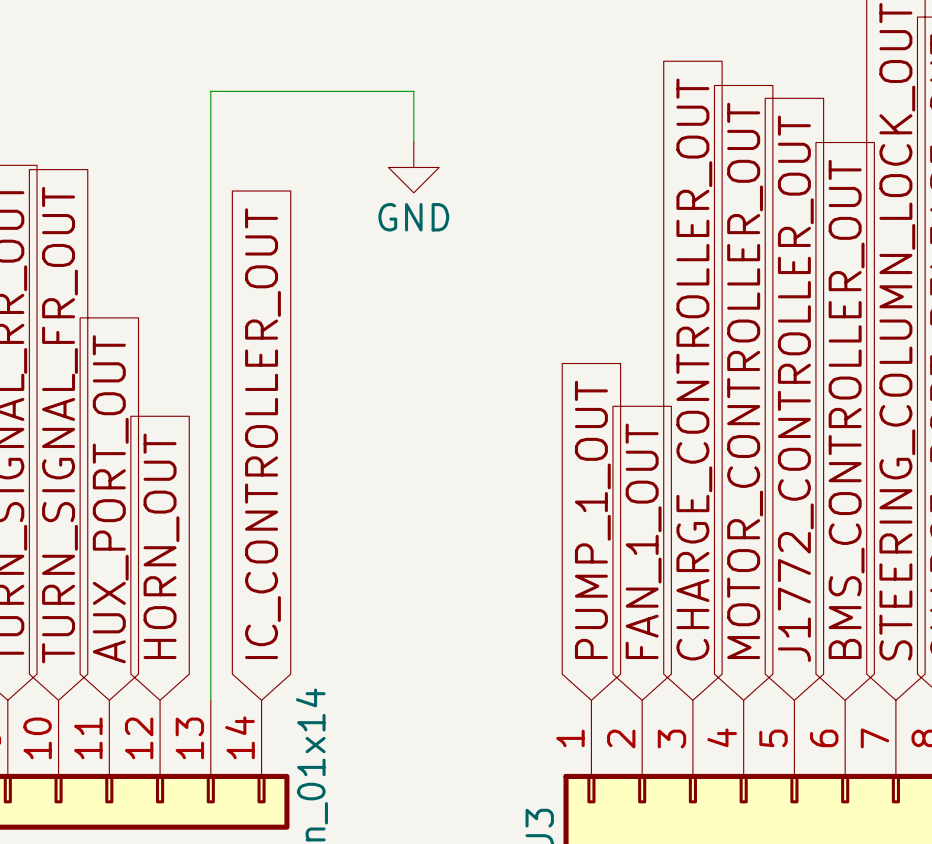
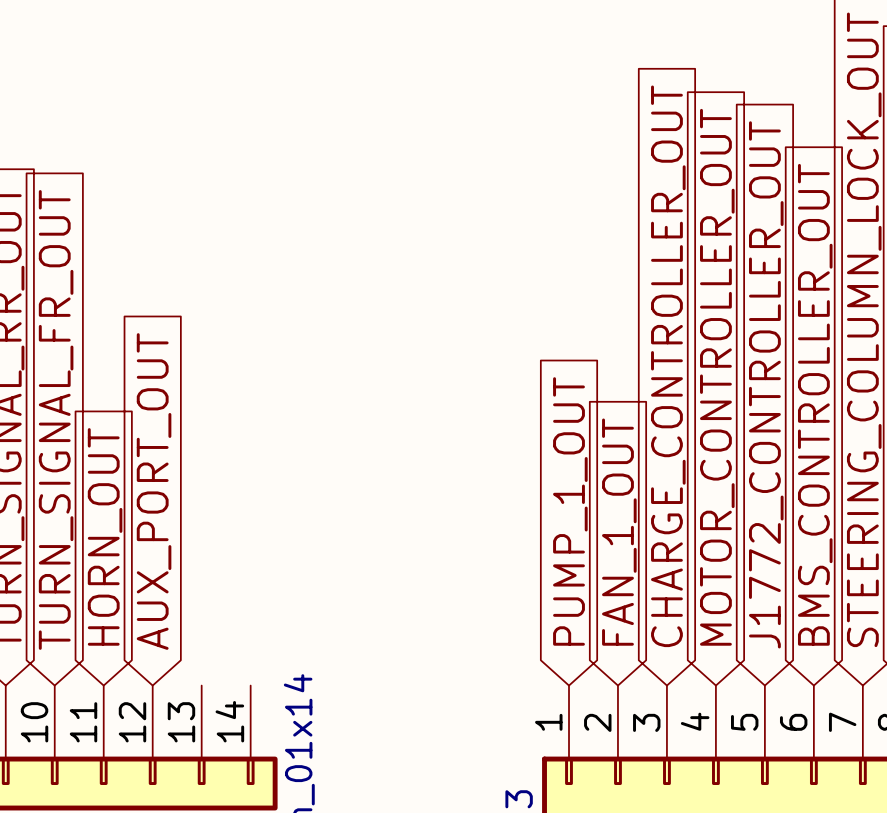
wire: (413, 142) (413, 91) (210, 91) (210, 700) -> none
power symbol: GND (413, 167) -> none
global label: IC_CONTROLLER_OUT (262, 433) -> none
global label: AUX_PORT_OUT (110, 499) -> HORN_OUT (105, 536)
global label: HORN_OUT (161, 546) -> AUX_PORT_OUT (154, 491)

